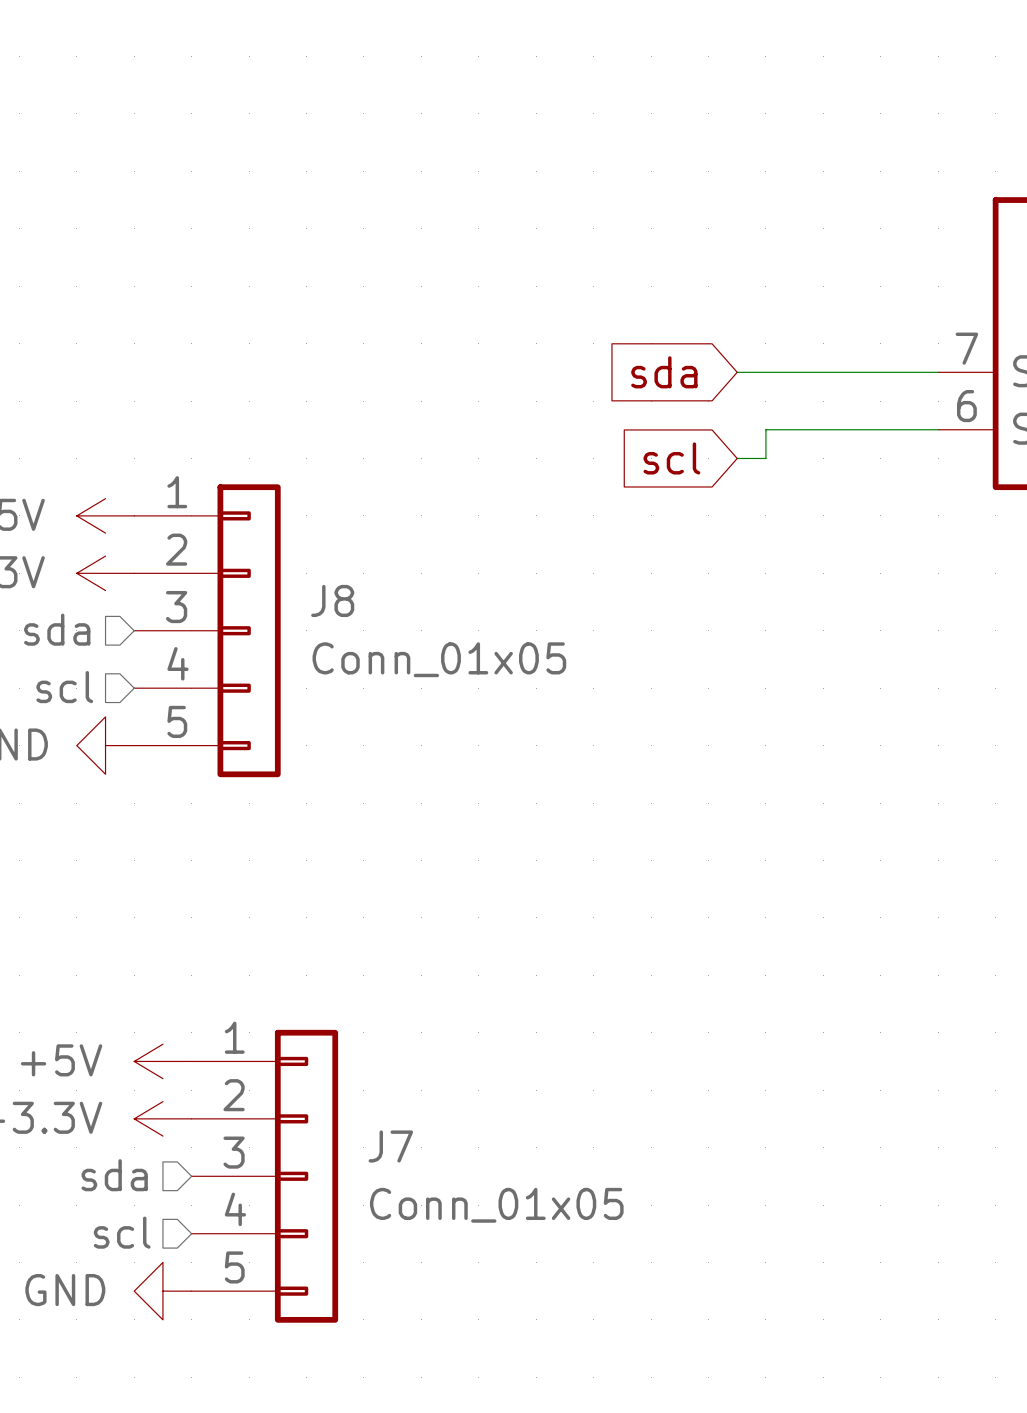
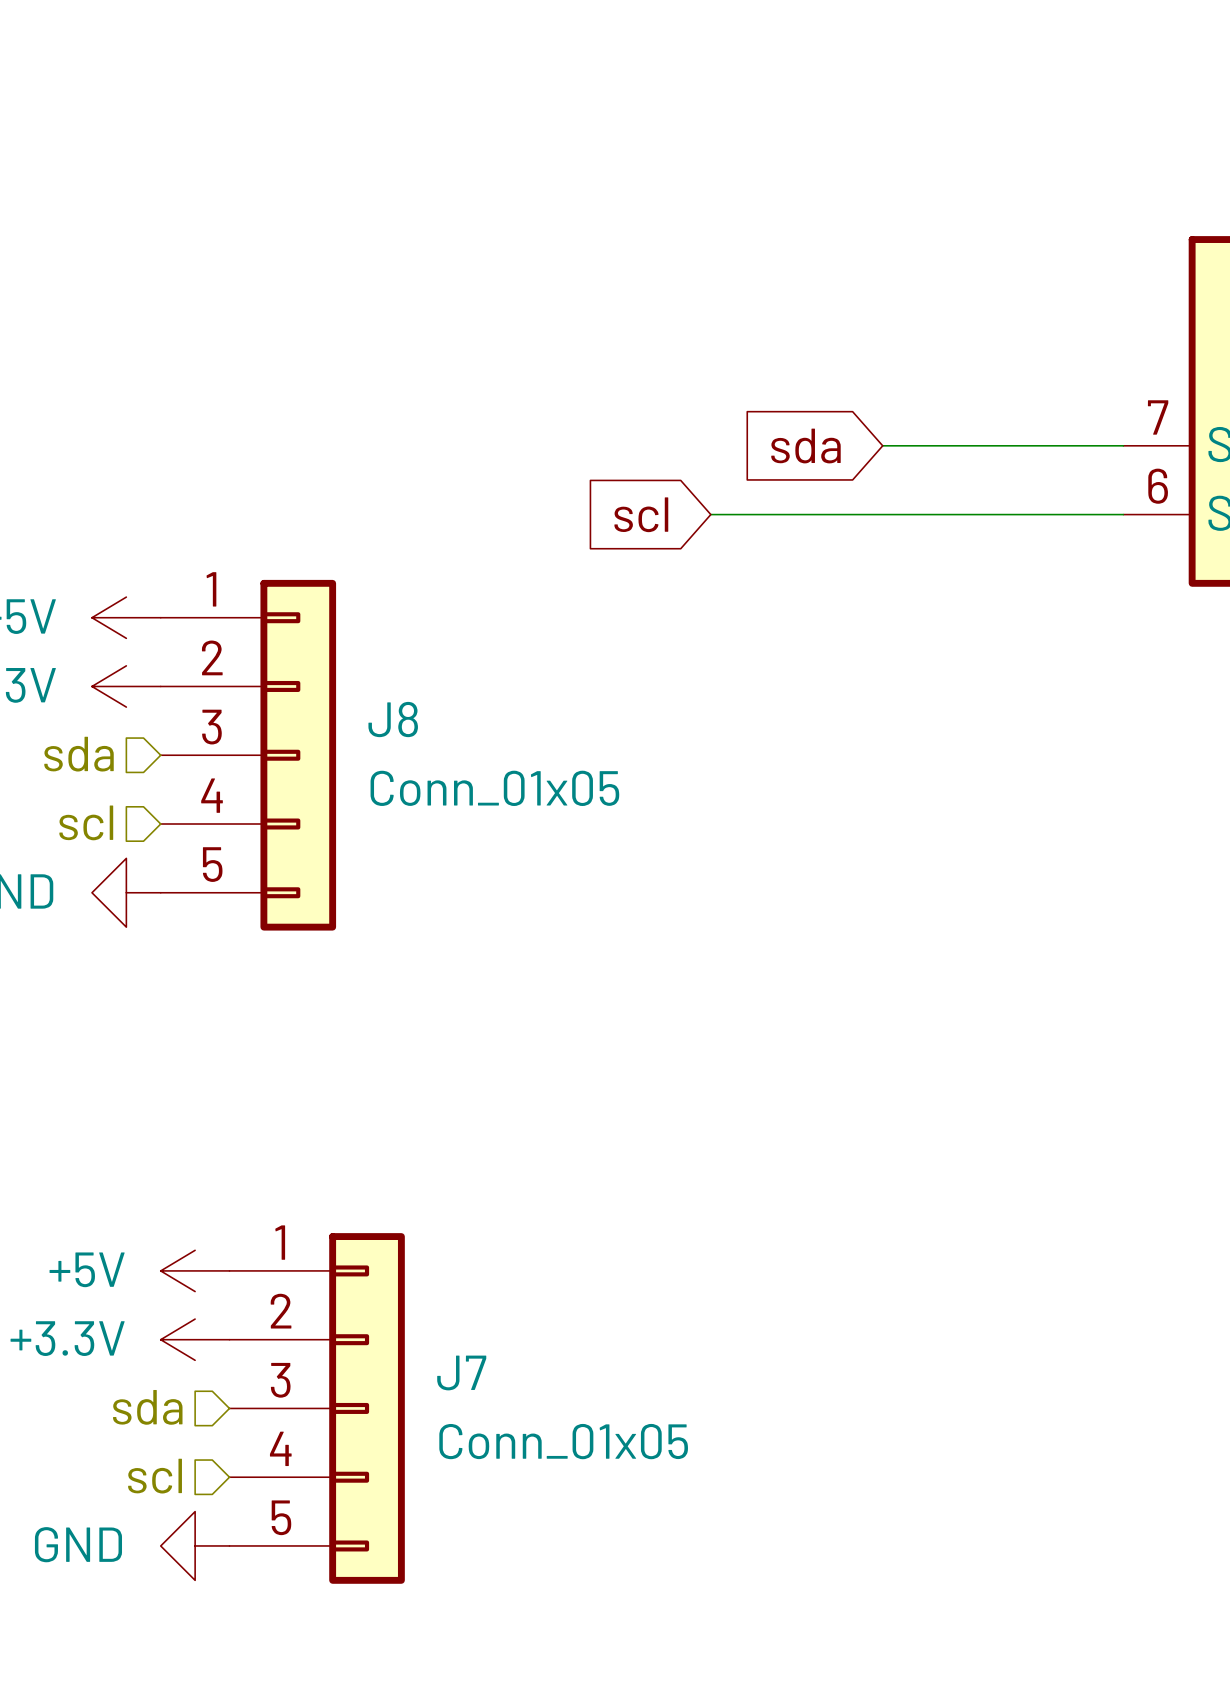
wire: (765, 429) (765, 458) (737, 458) -> (917, 514) (710, 514)
global label position: scl (671, 458) -> scl (641, 514)

